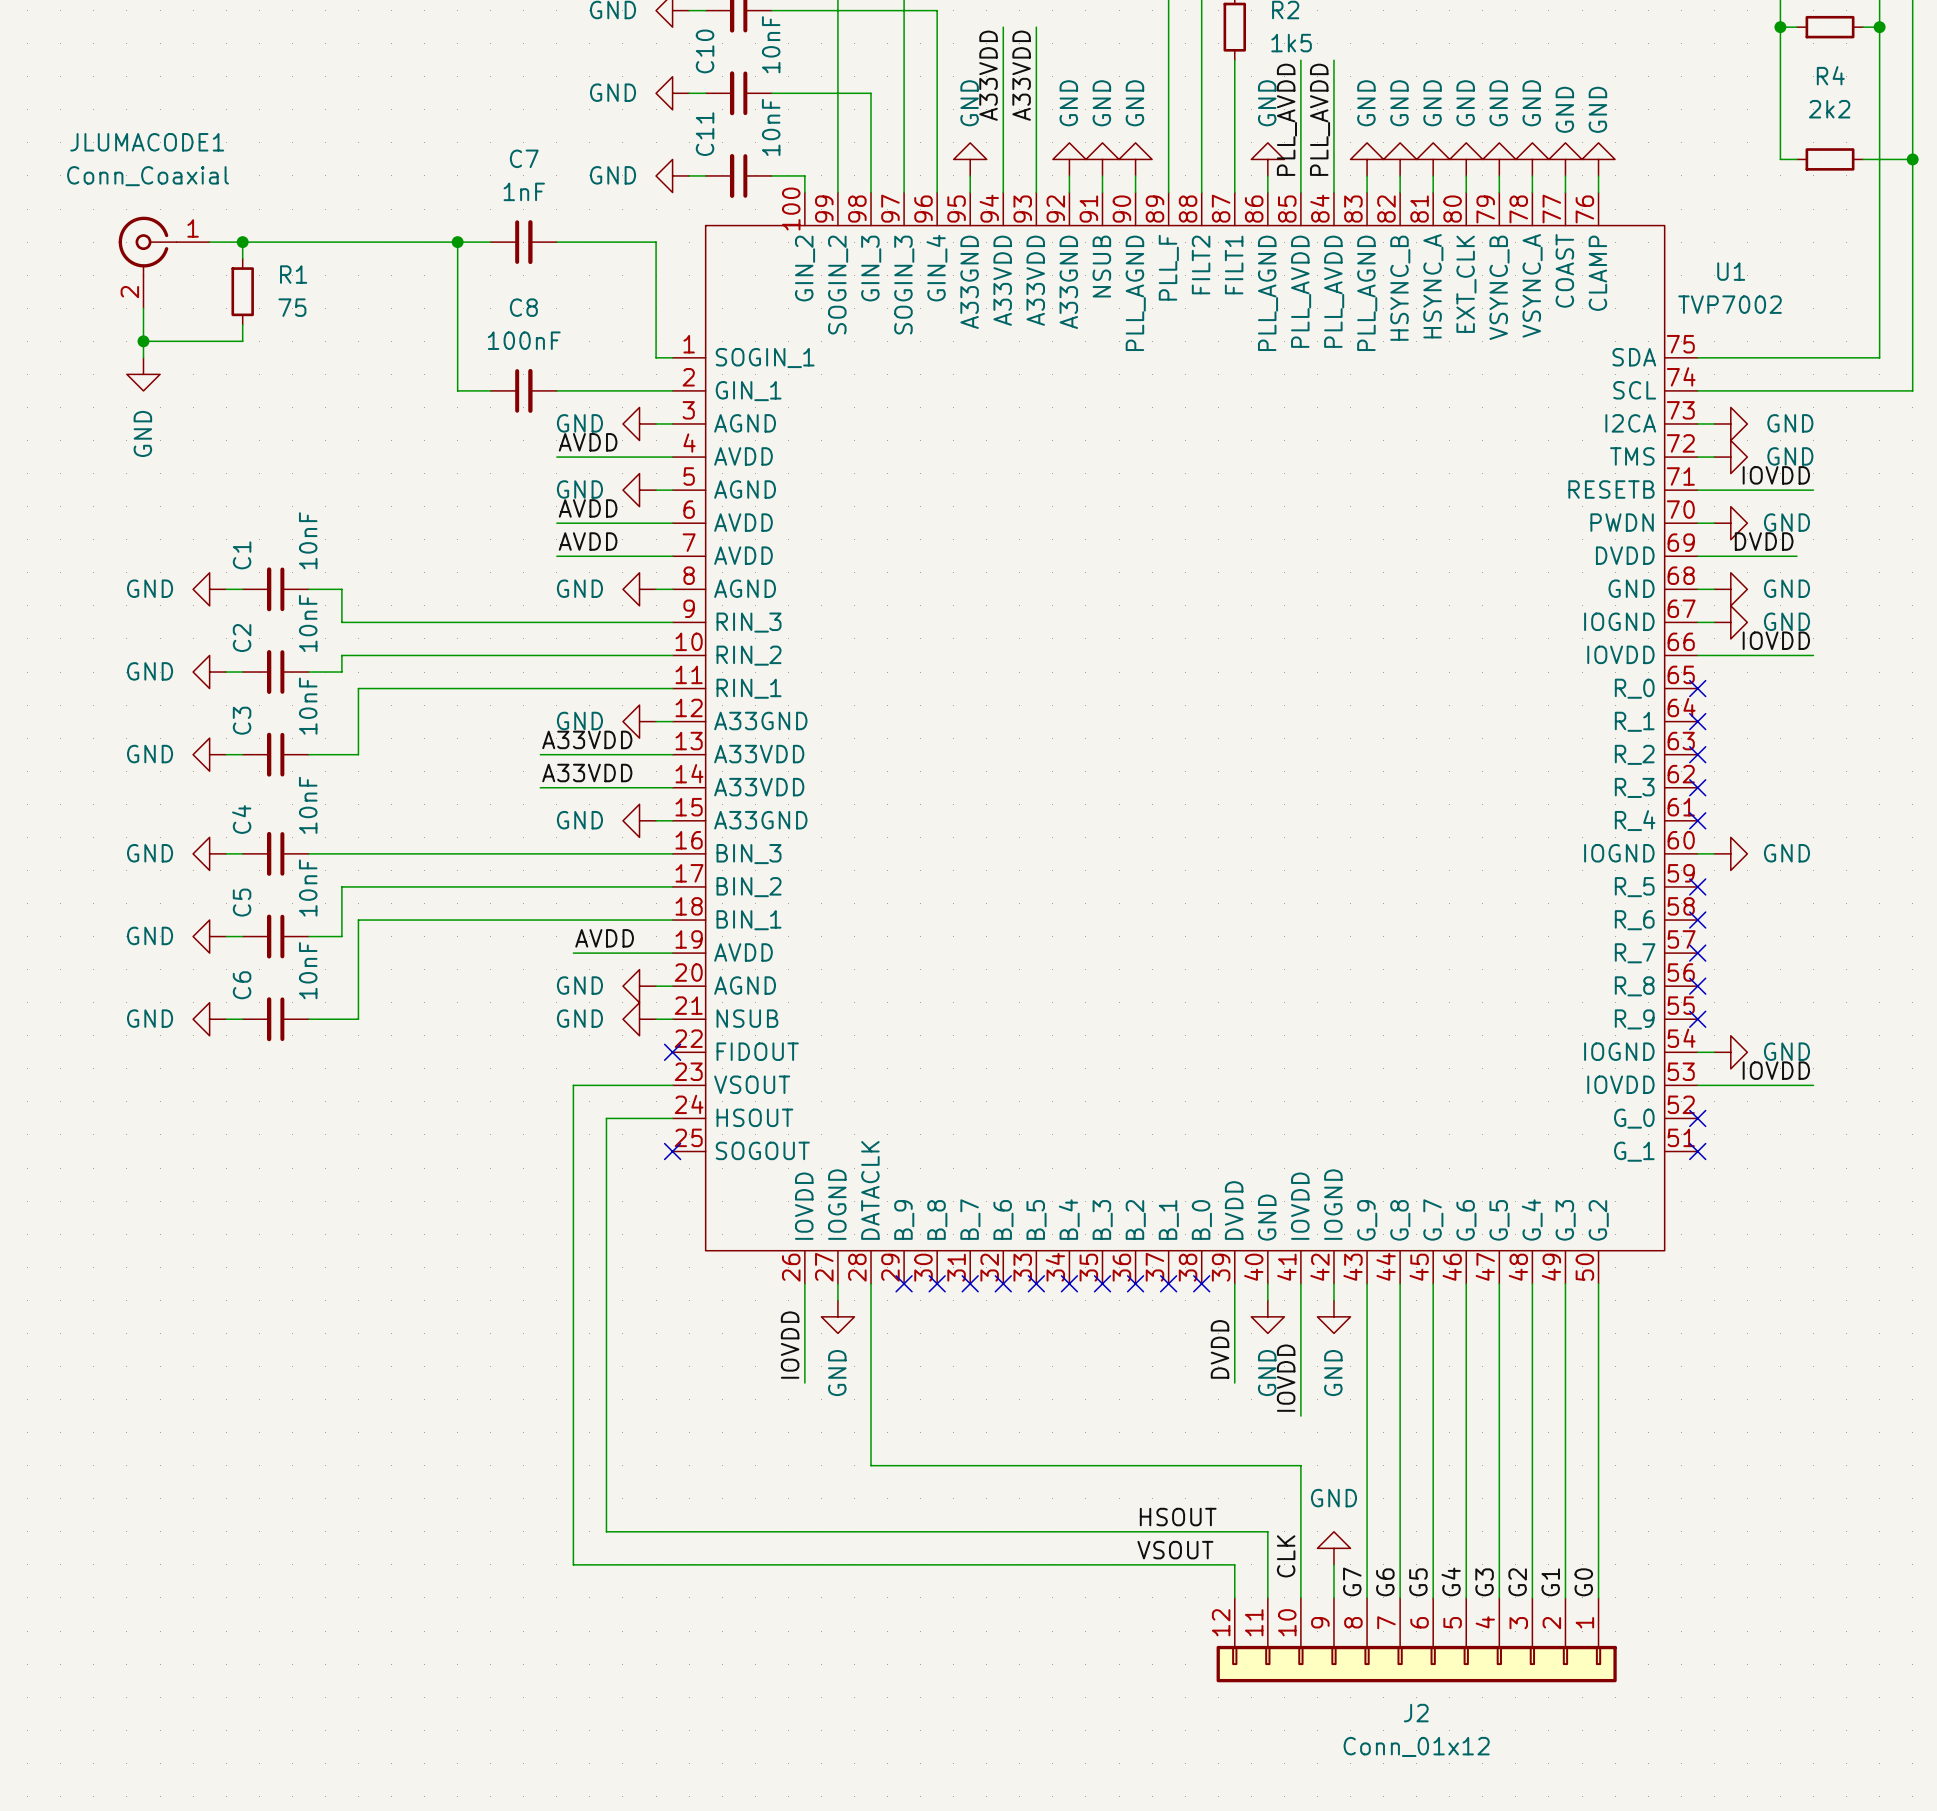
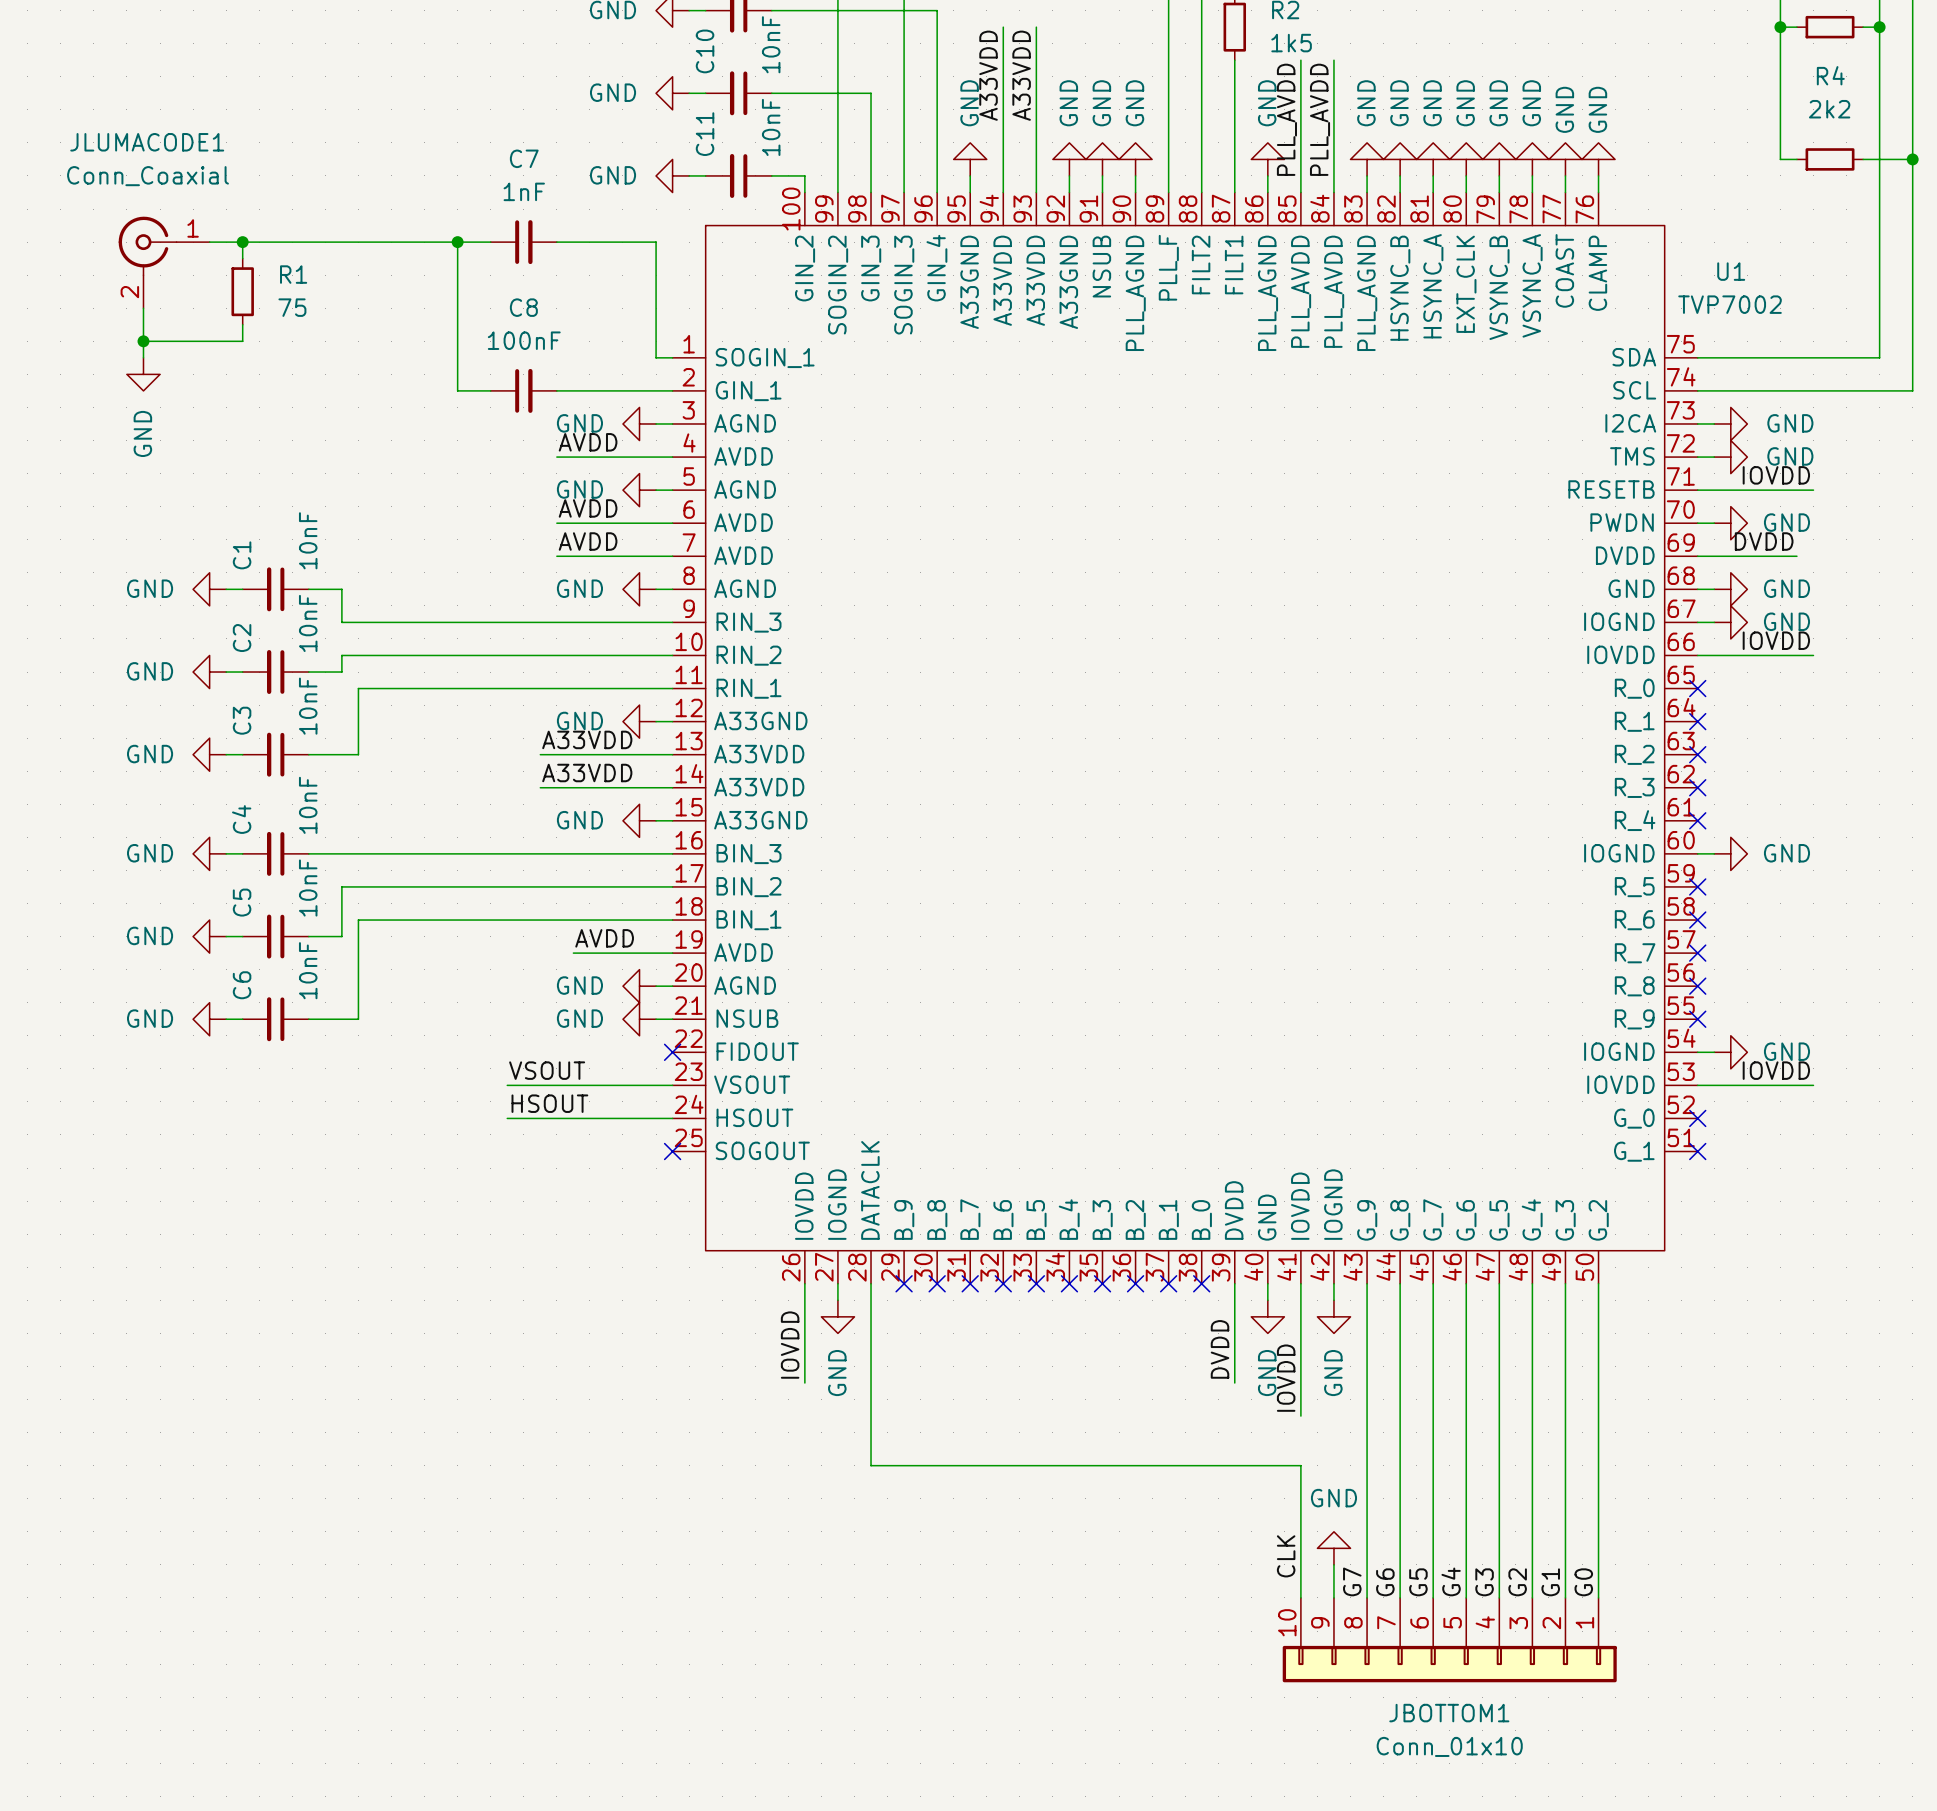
label: none -> VSOUT (547, 1070)
wire: (573, 1085) (573, 1564) (1234, 1564) (1234, 1597) -> (573, 1085) (507, 1085)
label: none -> HSOUT (549, 1103)
wire: (606, 1118) (606, 1531) (1267, 1531) (1267, 1597) -> (606, 1118) (507, 1118)
label: HSOUT (1178, 1517) -> none
label: VSOUT (1175, 1550) -> none
J2: Conn_01x12 (1416, 1640) -> none
JBOTTOM1: none -> Conn_01x10 (1449, 1640)

